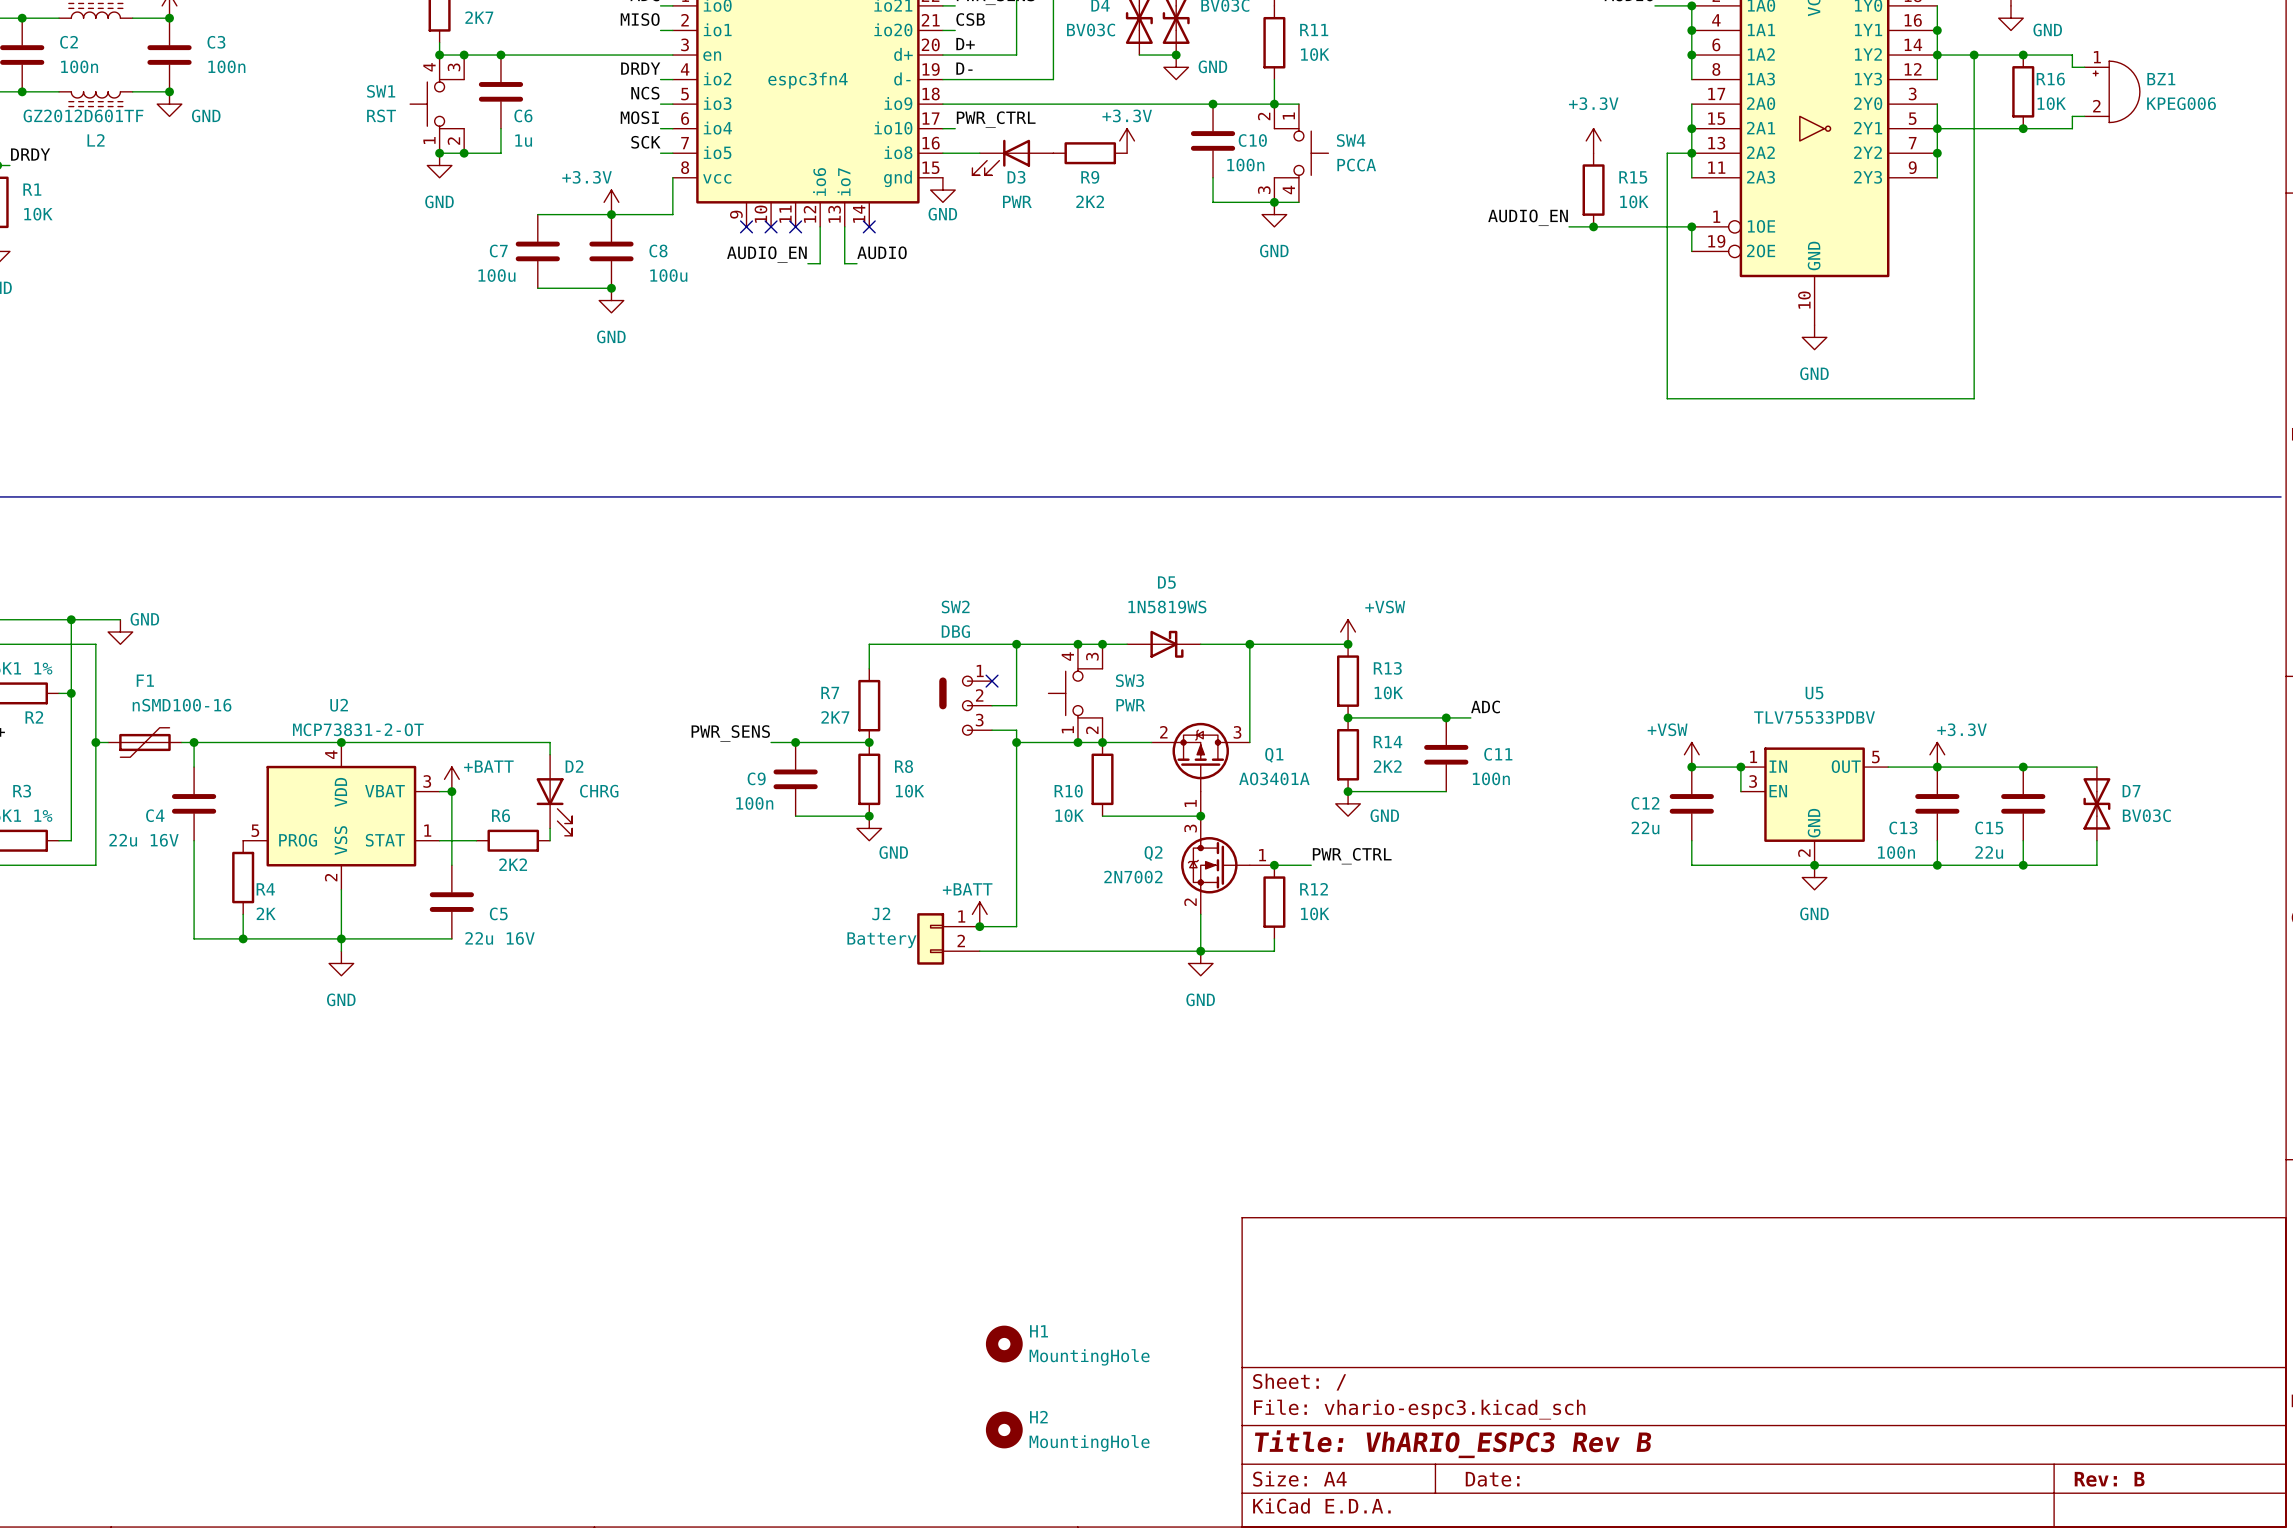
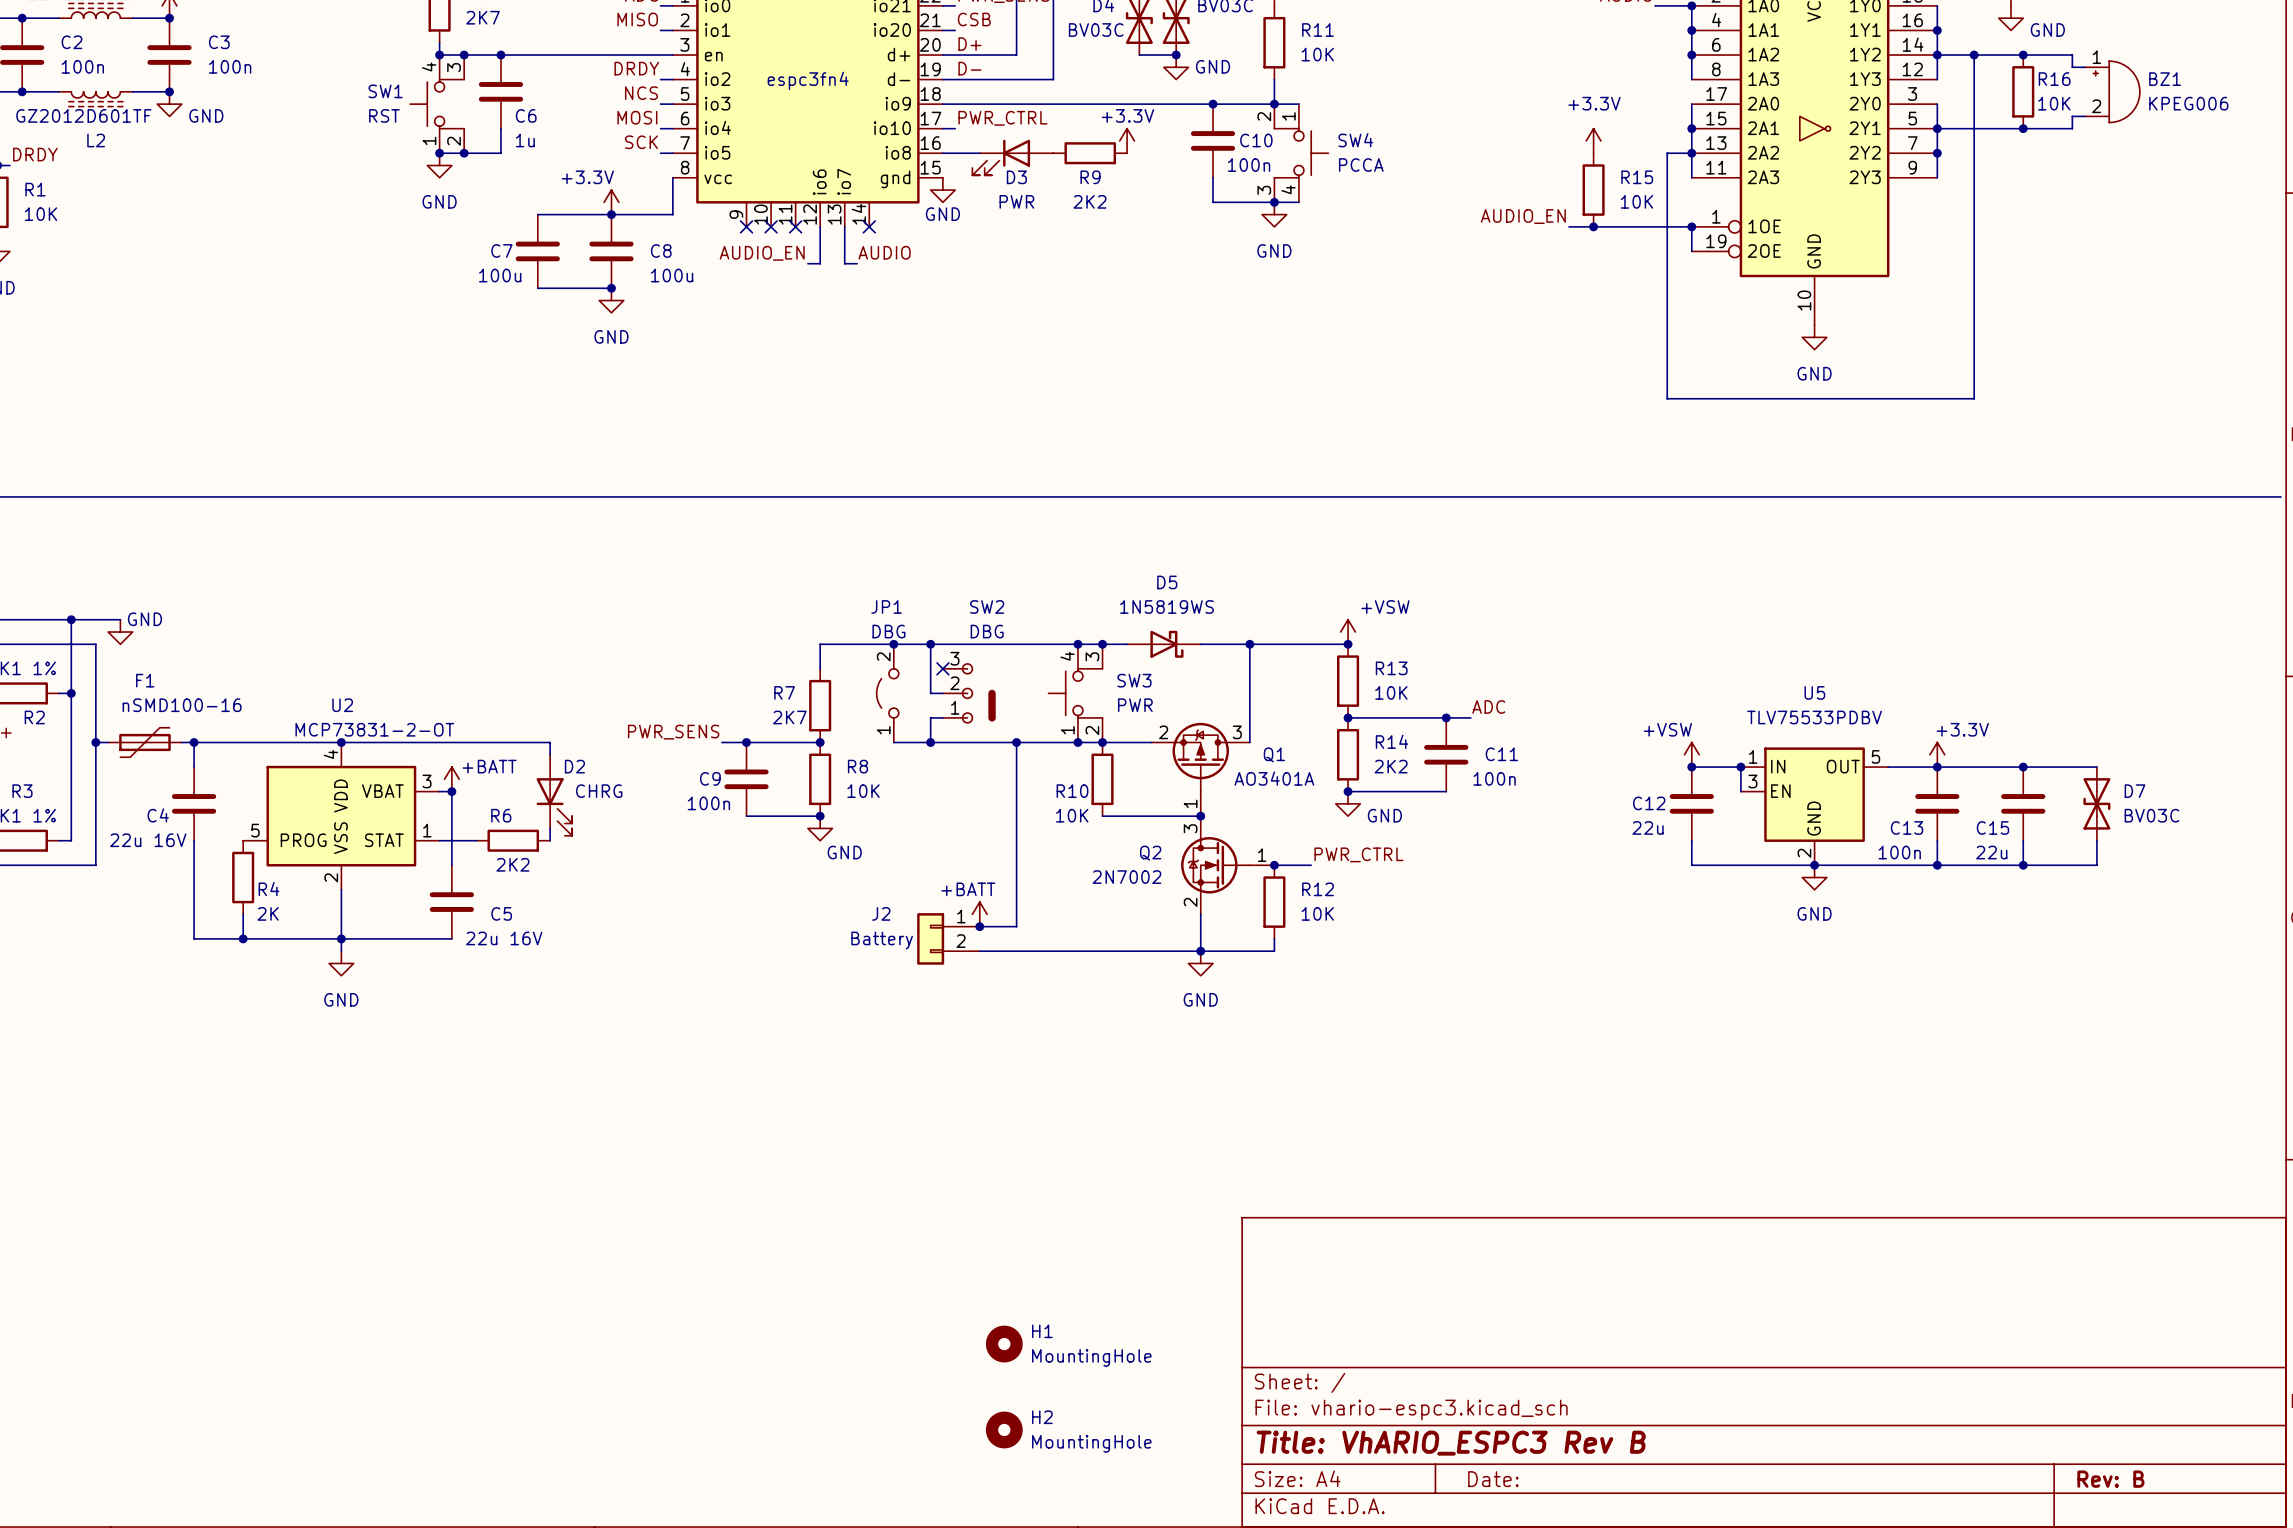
SW2 name position: SW2 (955, 607) -> SW2 (987, 607)
SW2 value position: DBG (955, 631) -> DBG (987, 631)
wire: (869, 644) (869, 668) -> (869, 644) (820, 644) (820, 668)
junction: none -> (893, 644)
wire: none -> (930, 644) (930, 693) (942, 693)
junction: none -> (930, 644)
wire: (1016, 644) (1016, 705) (992, 705) -> none
junction: (1016, 644) -> none
no-connect mark position: (992, 681) -> (942, 668)
JP1: none -> DBG (887, 693)
R7 position: (869, 705) -> (820, 705)
SW2 rotation: 0° (955, 705) -> 180° (979, 693)
wire: none -> (942, 717) (930, 717) (930, 742)
wire: (992, 730) (1016, 730) (1016, 742) -> (893, 742) (1016, 742)
label position: PWR_SENS (730, 733) -> PWR_SENS (673, 732)
junction: none -> (746, 742)
junction: (795, 742) -> none
wire: (820, 742) (869, 742) -> (721, 742) (771, 742)
junction: none -> (820, 742)
junction: (869, 742) -> none
junction: none -> (930, 742)
C9 position: (795, 779) -> (746, 779)
R8 position: (869, 779) -> (820, 779)
wire: (820, 816) (869, 816) -> (746, 816) (795, 816)
junction: none -> (820, 816)
junction: (869, 816) -> none
power symbol position: GND (869, 828) -> GND (820, 828)

